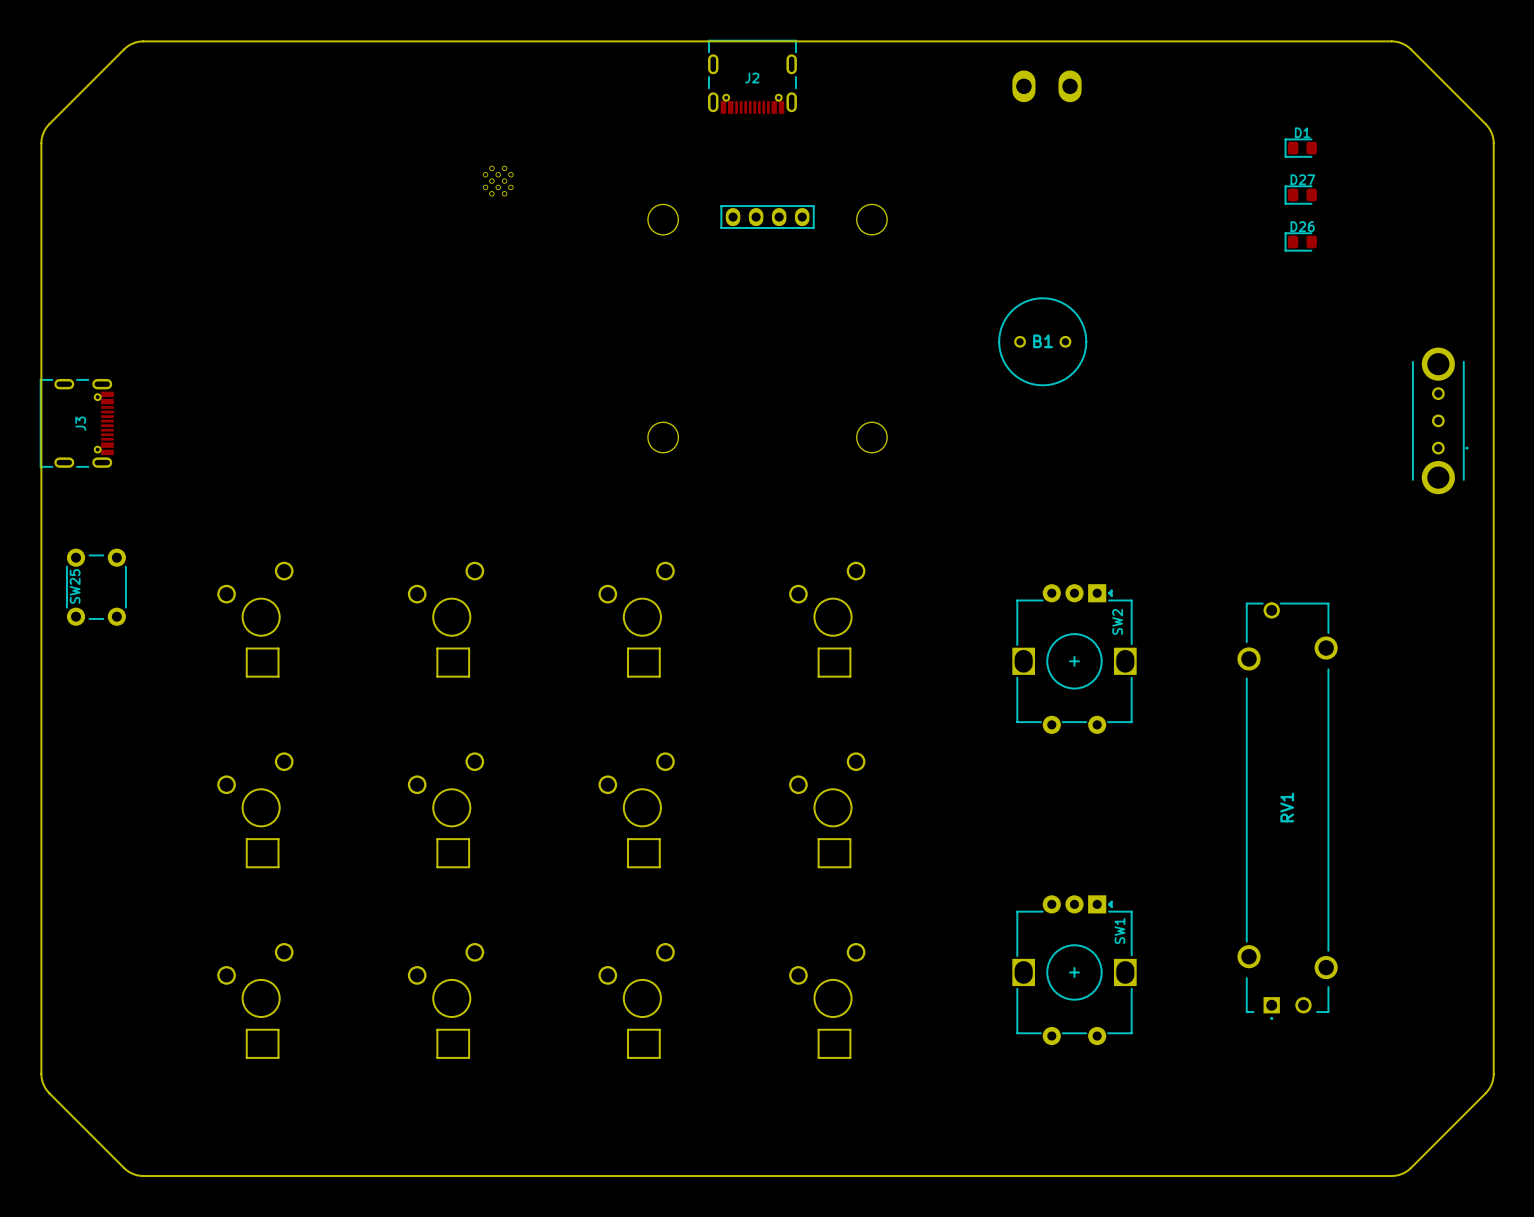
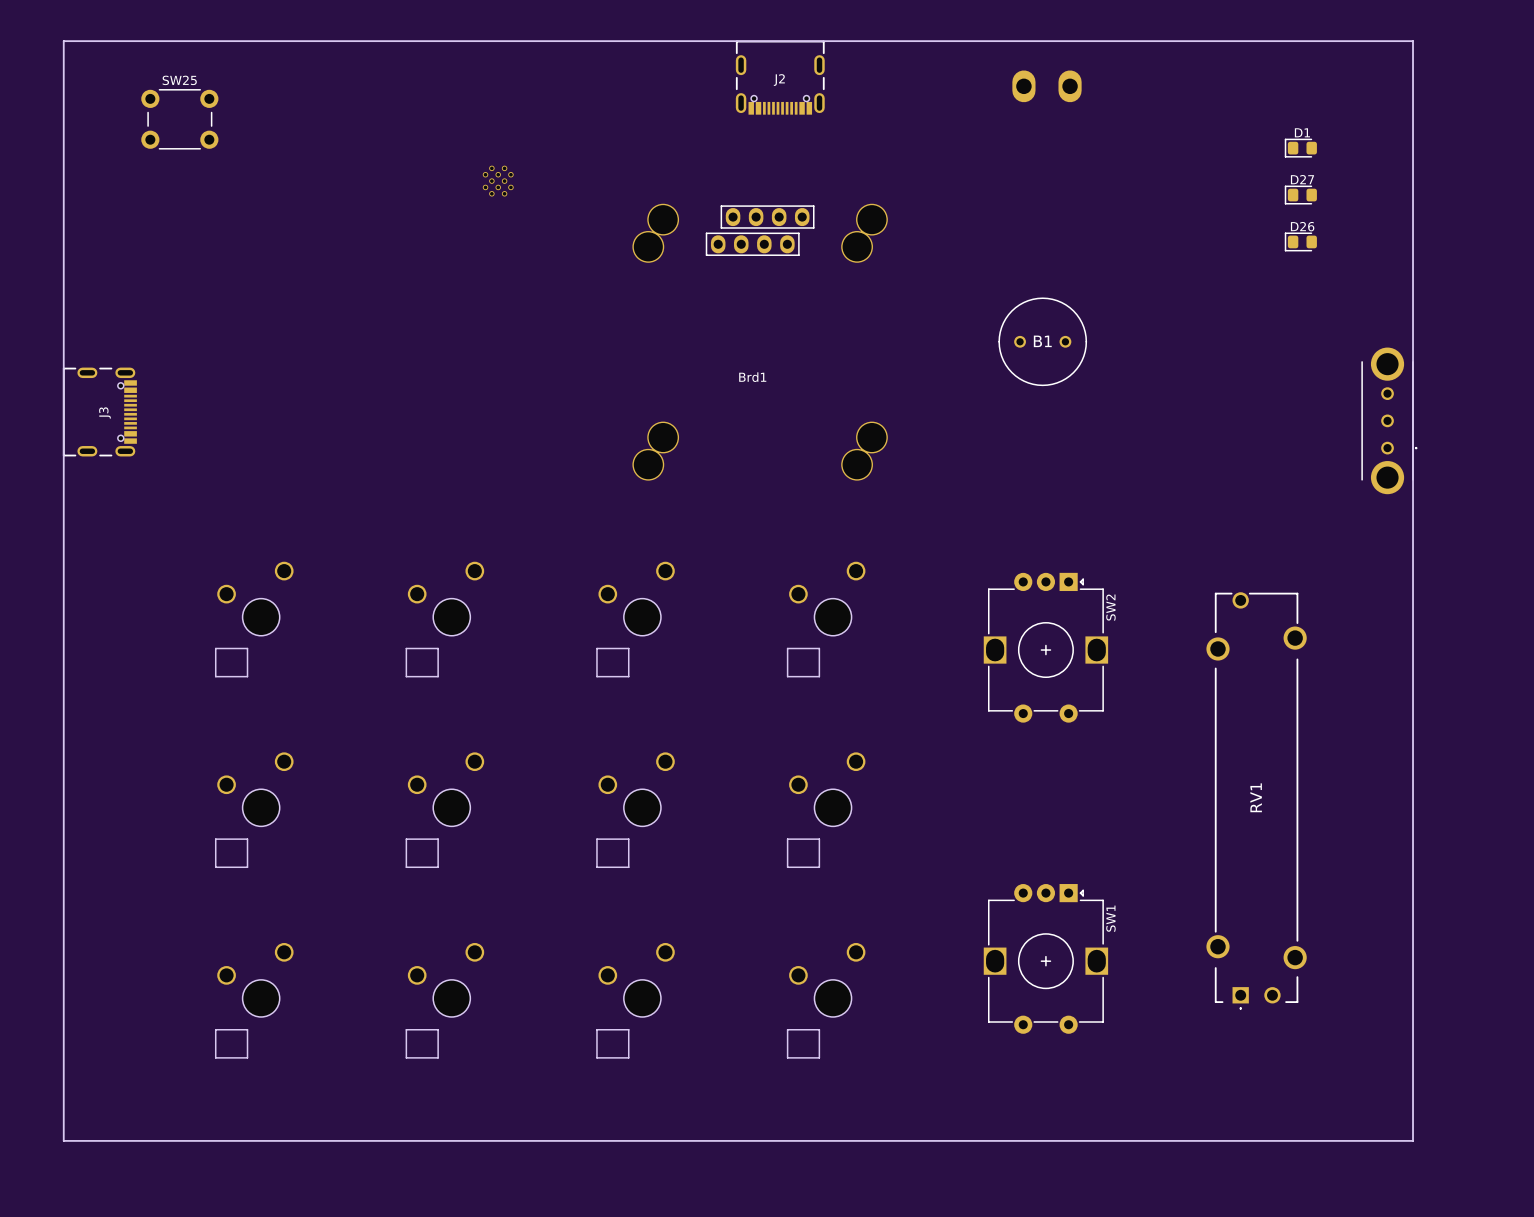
board edge: (143, 41) (1391, 41) (1399, 42) (1408, 47) (1485, 124) (1490, 130) (1493, 140) (1493, 1073) (1491, 1084) (1487, 1091) (1410, 1168) (1402, 1173) (1391, 1176) (143, 1176) (135, 1174) (126, 1169) (49, 1093) (41, 1077) (41, 143) (43, 133) (49, 124) (126, 47) (133, 43) (143, 41) -> (63, 41) (63, 1140) (1413, 1140) (1413, 41) (63, 41)
J2 position: (752, 76) -> (780, 77)
Brd1: none -> (752, 355)
part position: (1440, 420) -> (1389, 420)
J3 position: (76, 423) -> (99, 412)
SW25 rotation: 0° (96, 587) -> 90° clockwise (179, 119)
SW25 position: (96, 587) -> (179, 119)
SW2 name position: SW2 (1117, 621) -> SW2 (1110, 607)
SW2 position: (1074, 659) -> (1045, 647)
part position: (262, 662) -> (231, 662)
part position: (453, 662) -> (422, 662)
part position: (643, 662) -> (612, 662)
part position: (834, 662) -> (803, 662)
RV1 position: (1287, 810) -> (1256, 800)
part position: (262, 853) -> (231, 853)
part position: (453, 853) -> (422, 853)
part position: (643, 853) -> (612, 853)
part position: (834, 853) -> (803, 853)
SW1 name position: SW1 (1119, 931) -> SW1 (1110, 918)
SW1 position: (1074, 970) -> (1045, 958)
part position: (262, 1043) -> (231, 1043)
part position: (453, 1043) -> (422, 1043)
part position: (643, 1043) -> (612, 1043)
part position: (834, 1043) -> (803, 1043)

